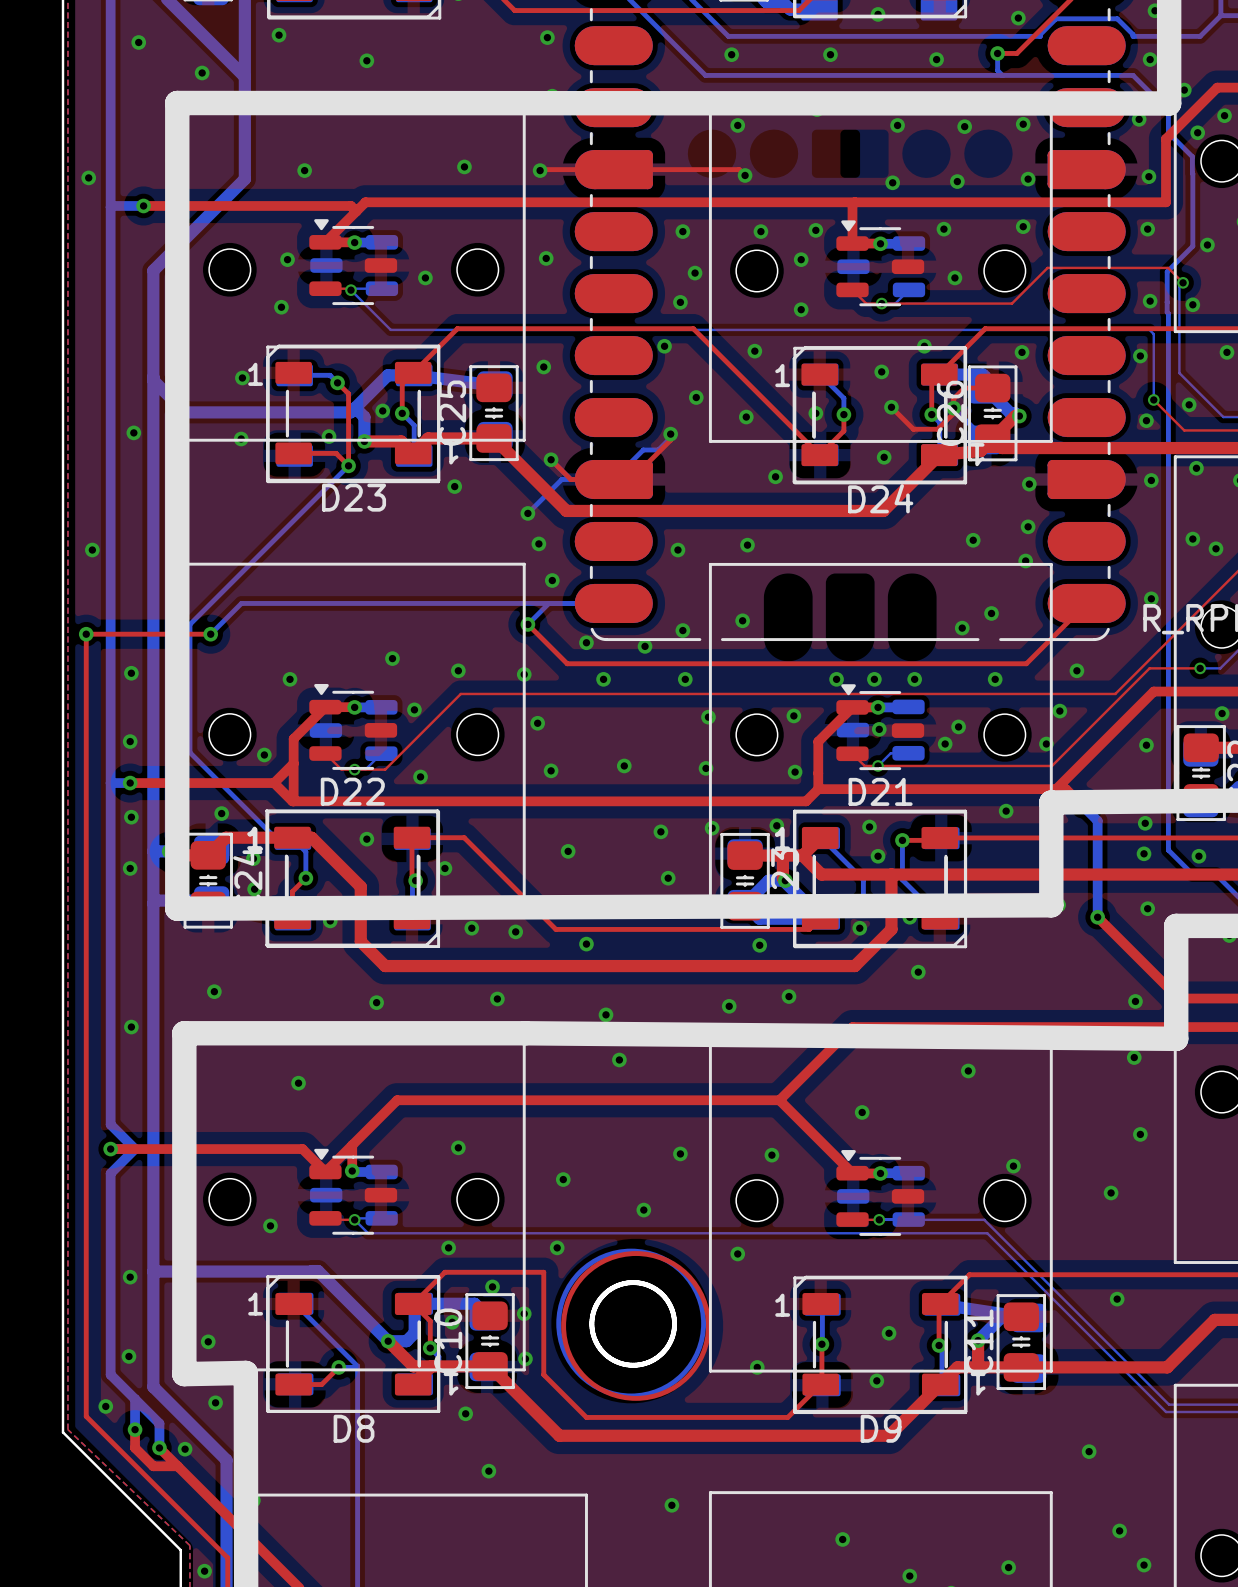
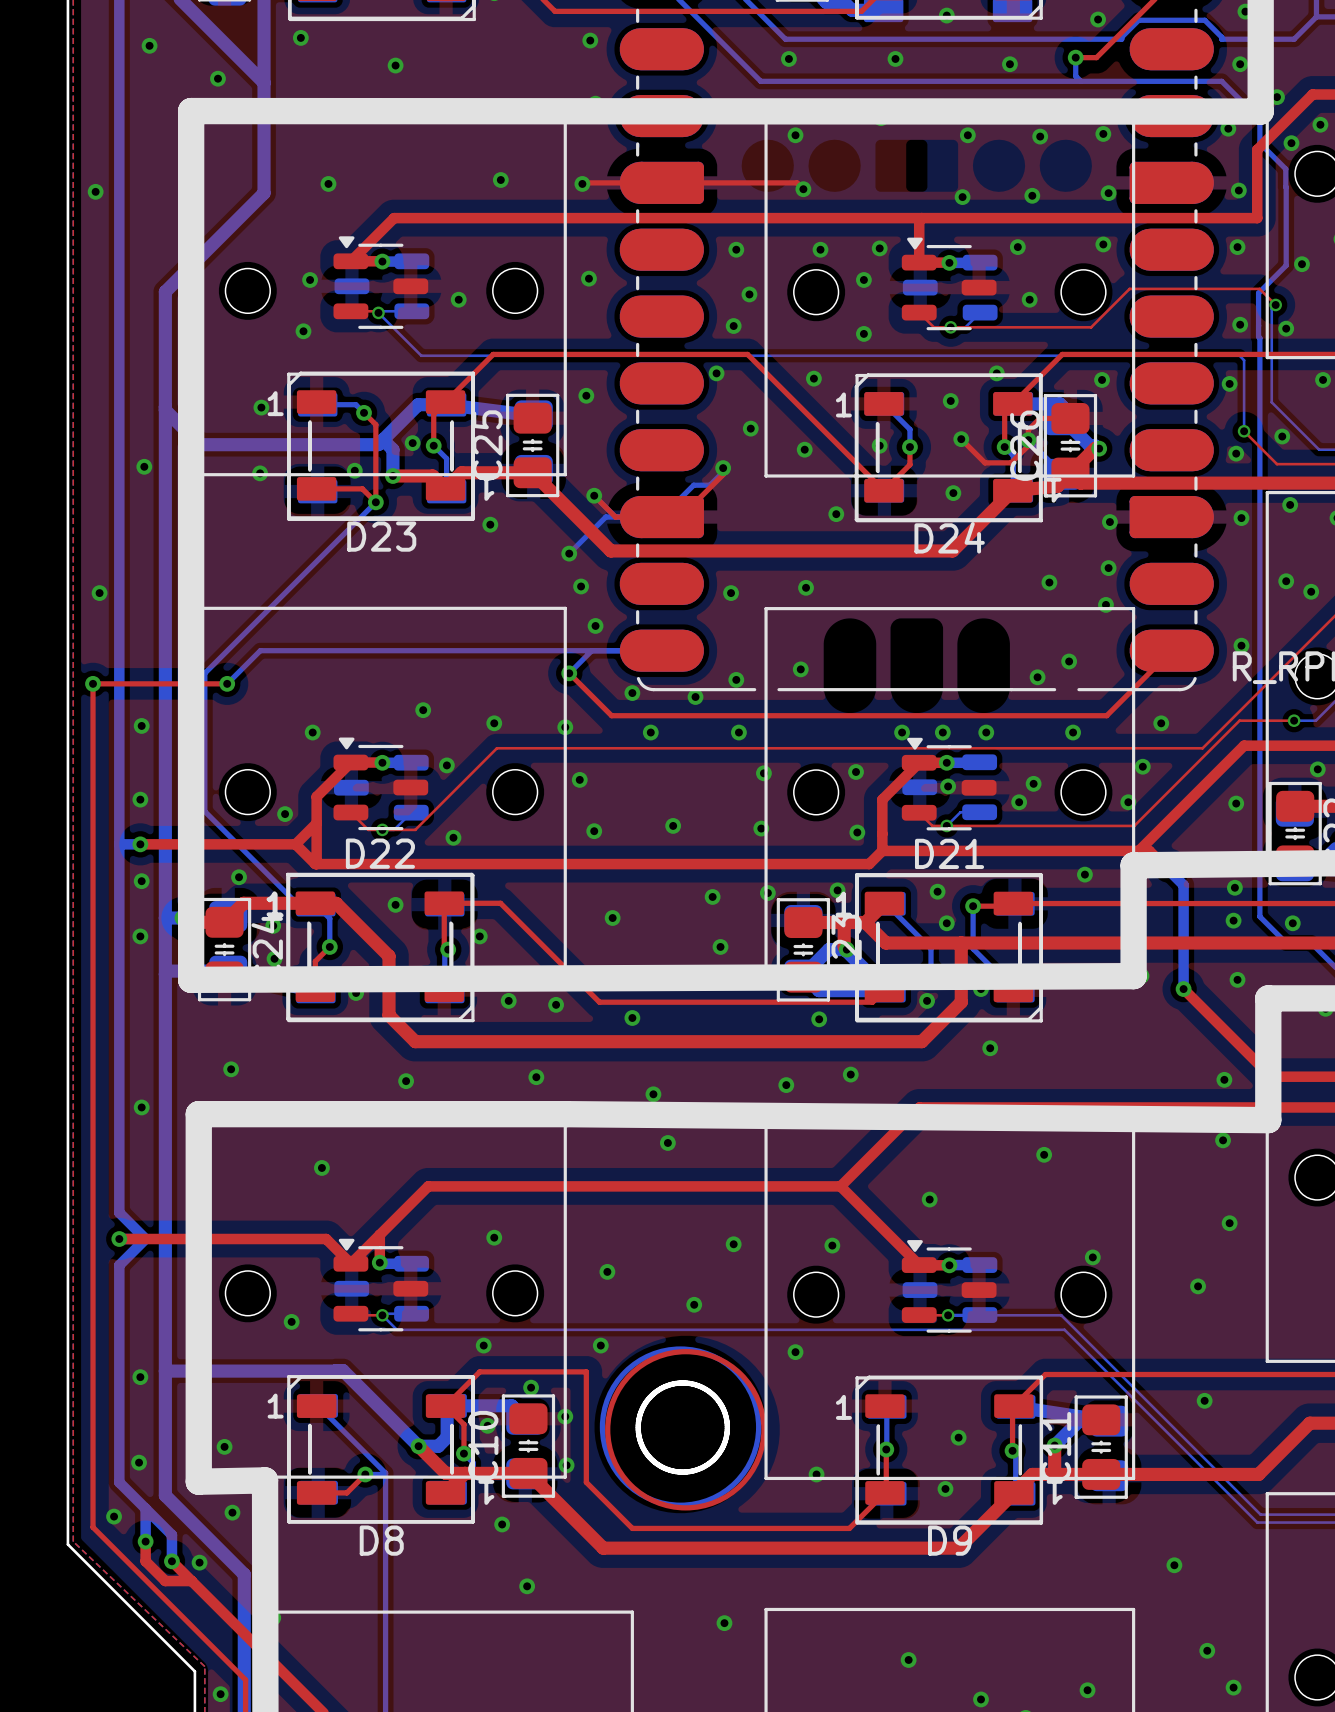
top track: (143, 205) (351, 205) (356, 211) -> none
bottom track: (143, 205) (110, 207) -> none
via: (143, 205) -> none

